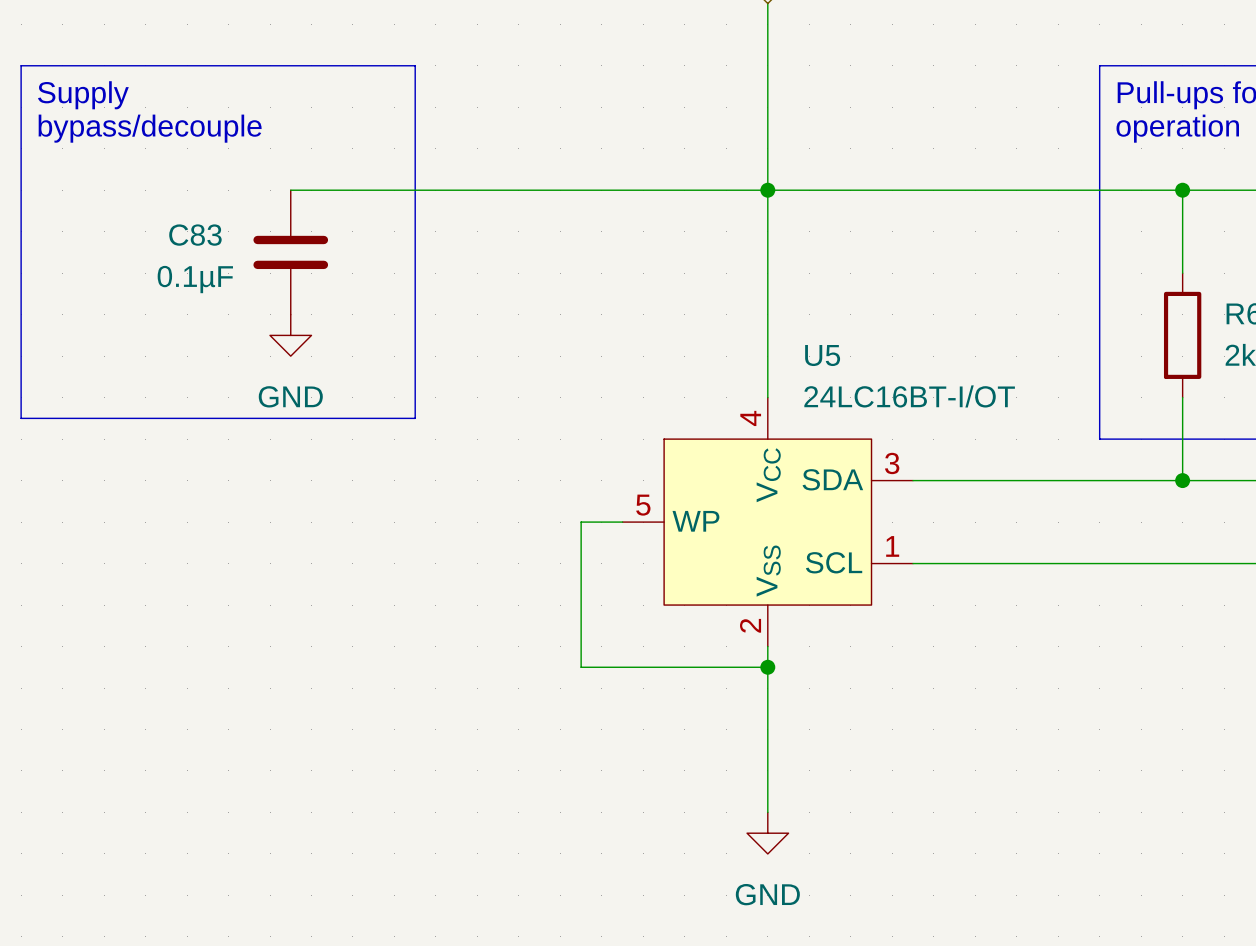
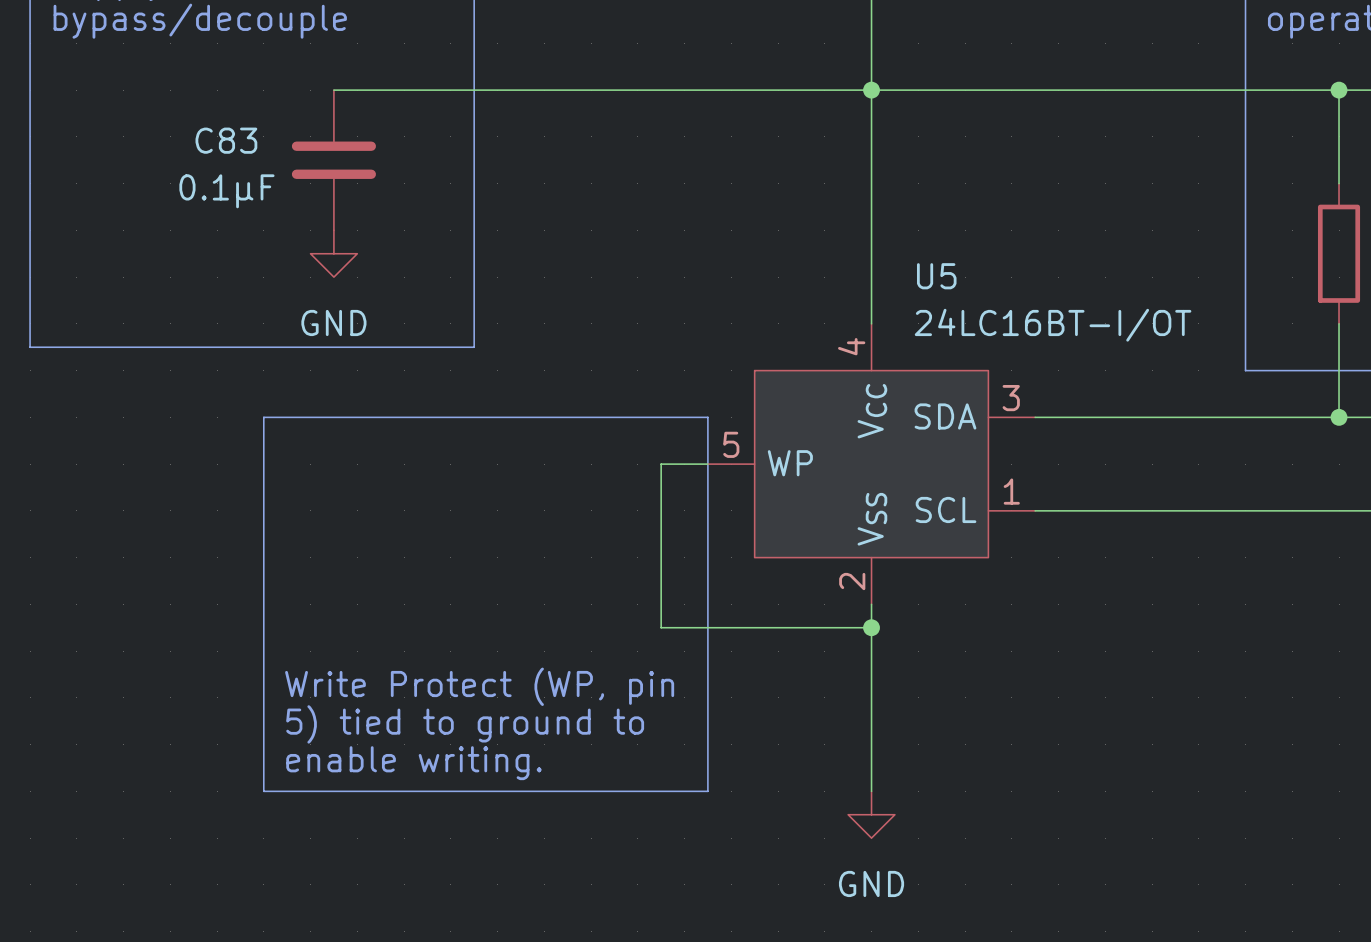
line: none -> (263, 417) (707, 417) (707, 791) (263, 791) (263, 417)
text: none -> Write Protect (WP, pin (479, 686)
text: none -> 5) tied to ground to (465, 724)
text: none -> enable writing. (413, 763)

